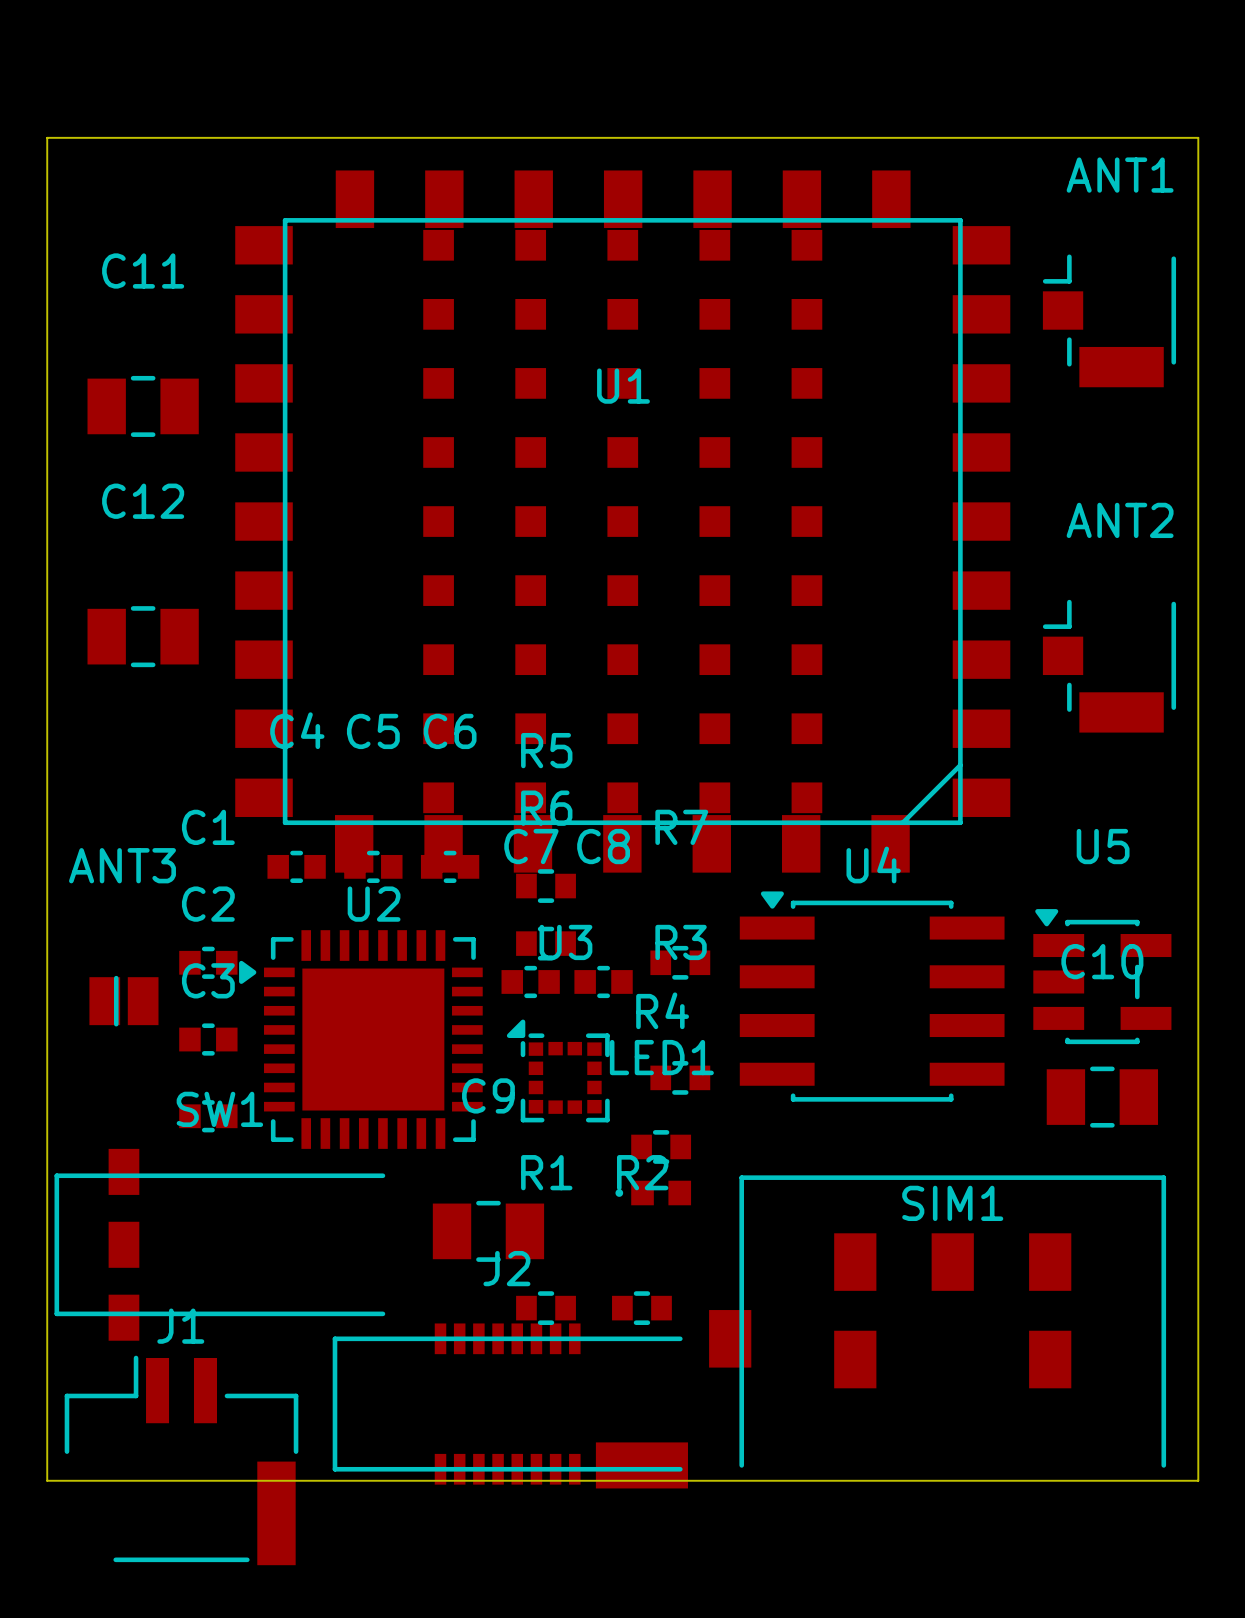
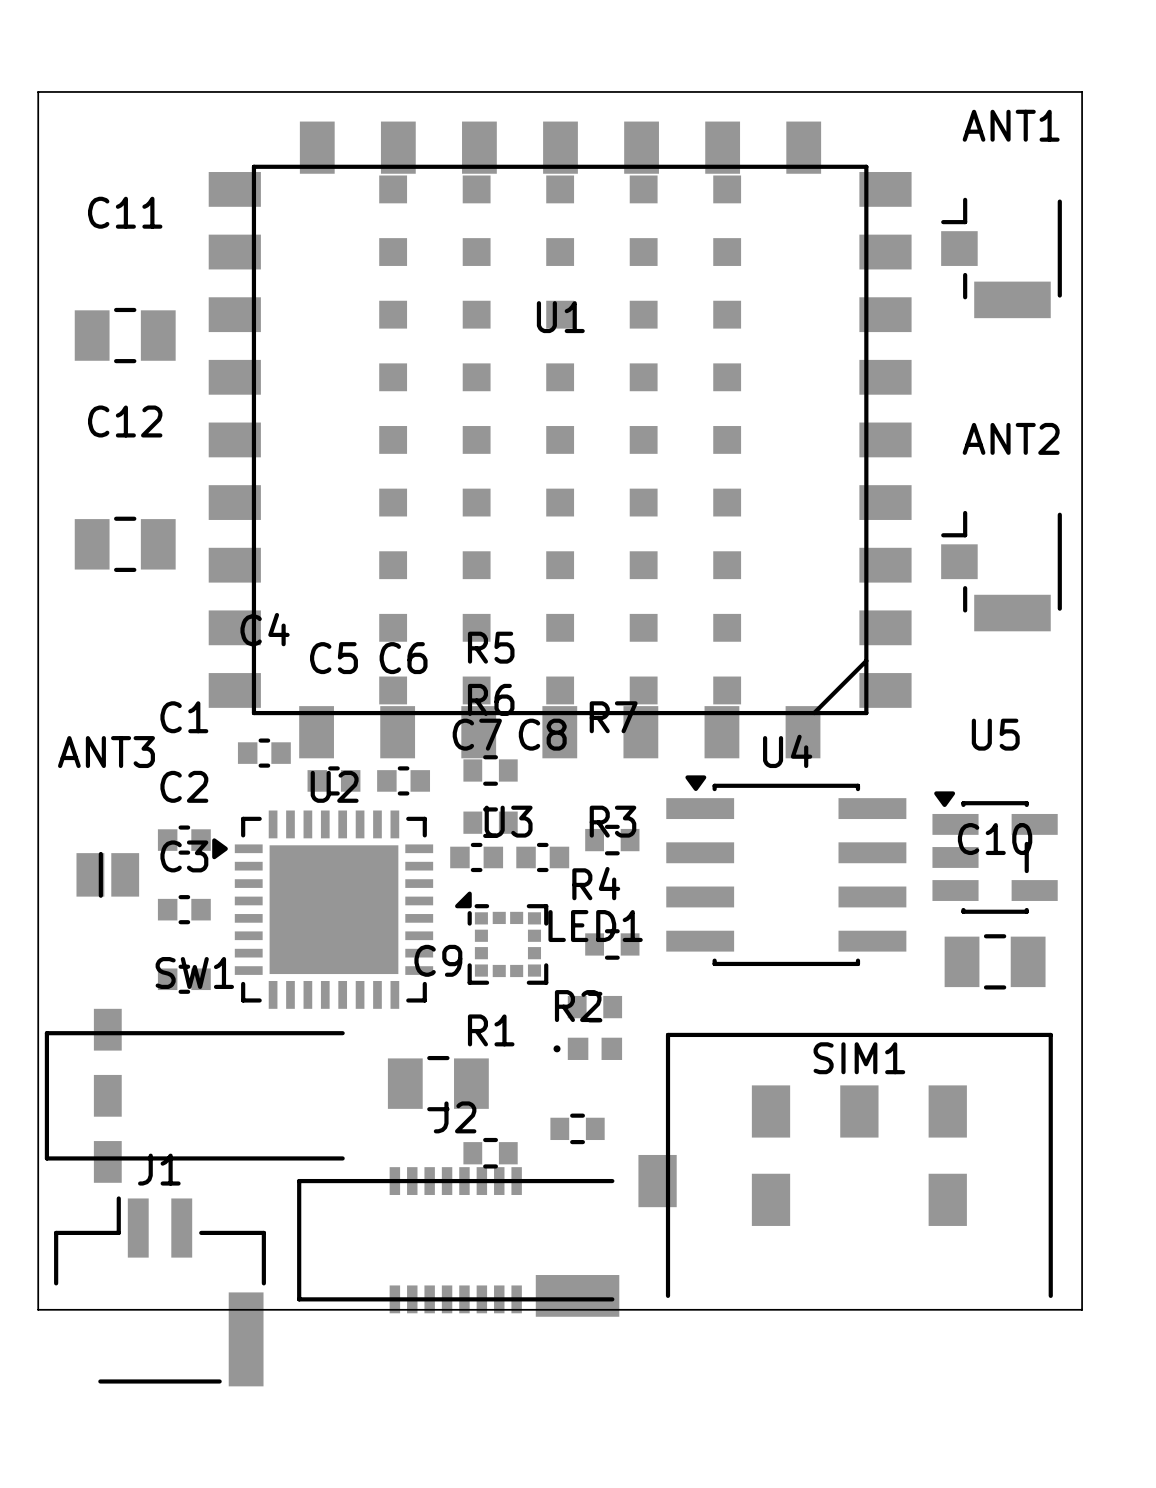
C5 position: (373, 866) -> (333, 780)
C6 position: (450, 866) -> (403, 780)
R2 position: (641, 1308) -> (577, 1128)

